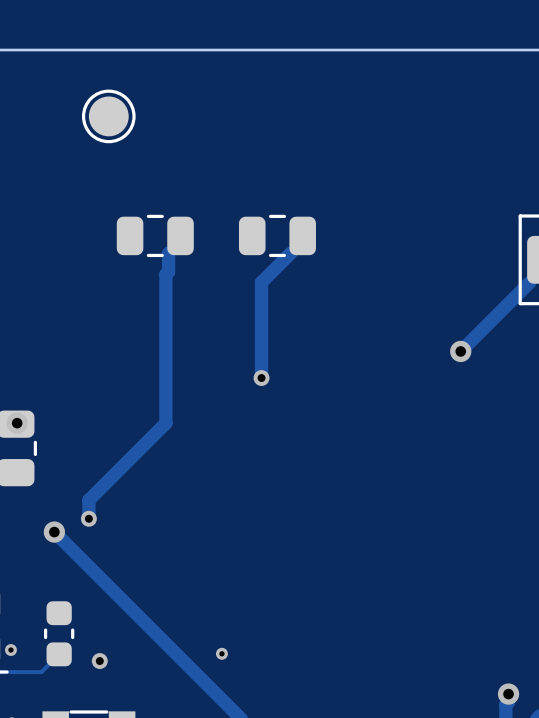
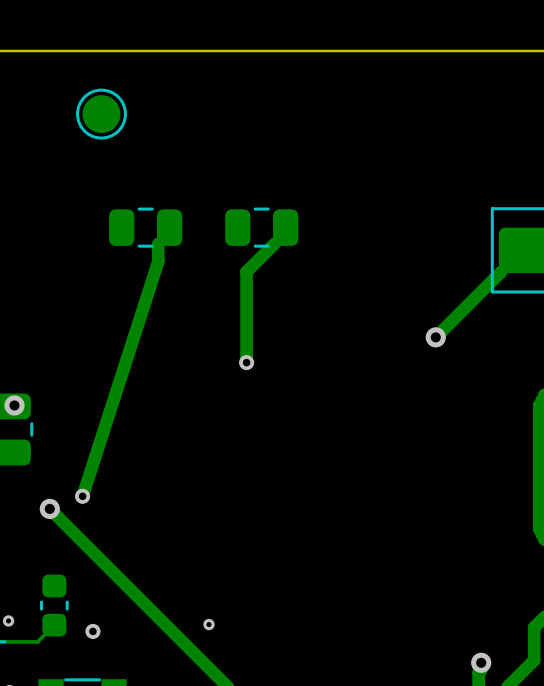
track: (168, 271) (165, 274) (165, 423) (88, 500) (88, 518) -> (158, 261) (82, 496)

